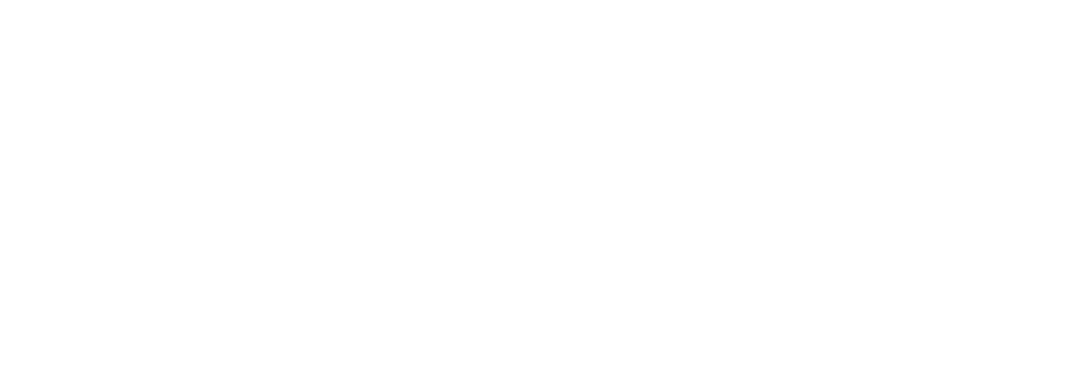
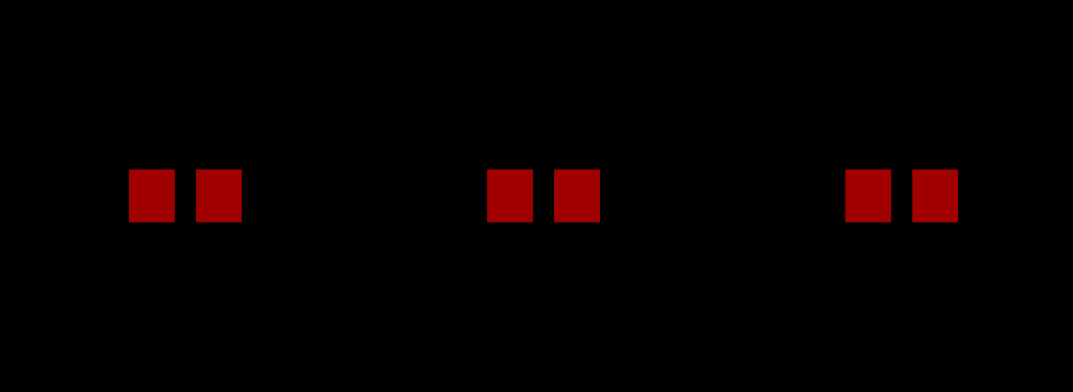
part: none -> (185, 195)
part: none -> (543, 195)
part: none -> (901, 195)

